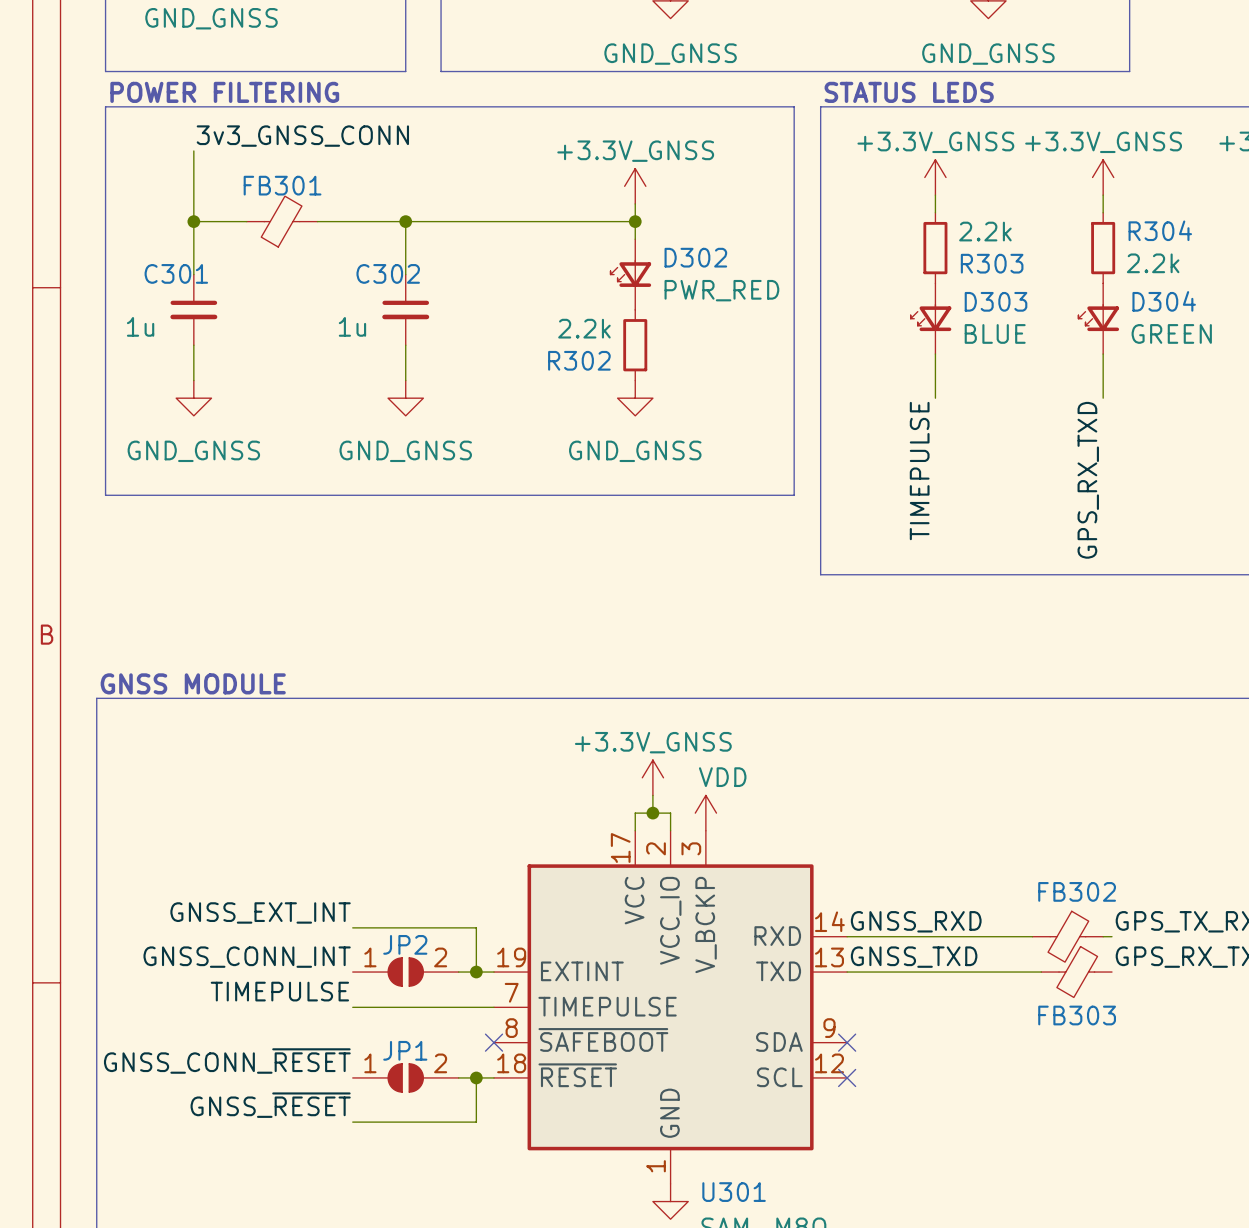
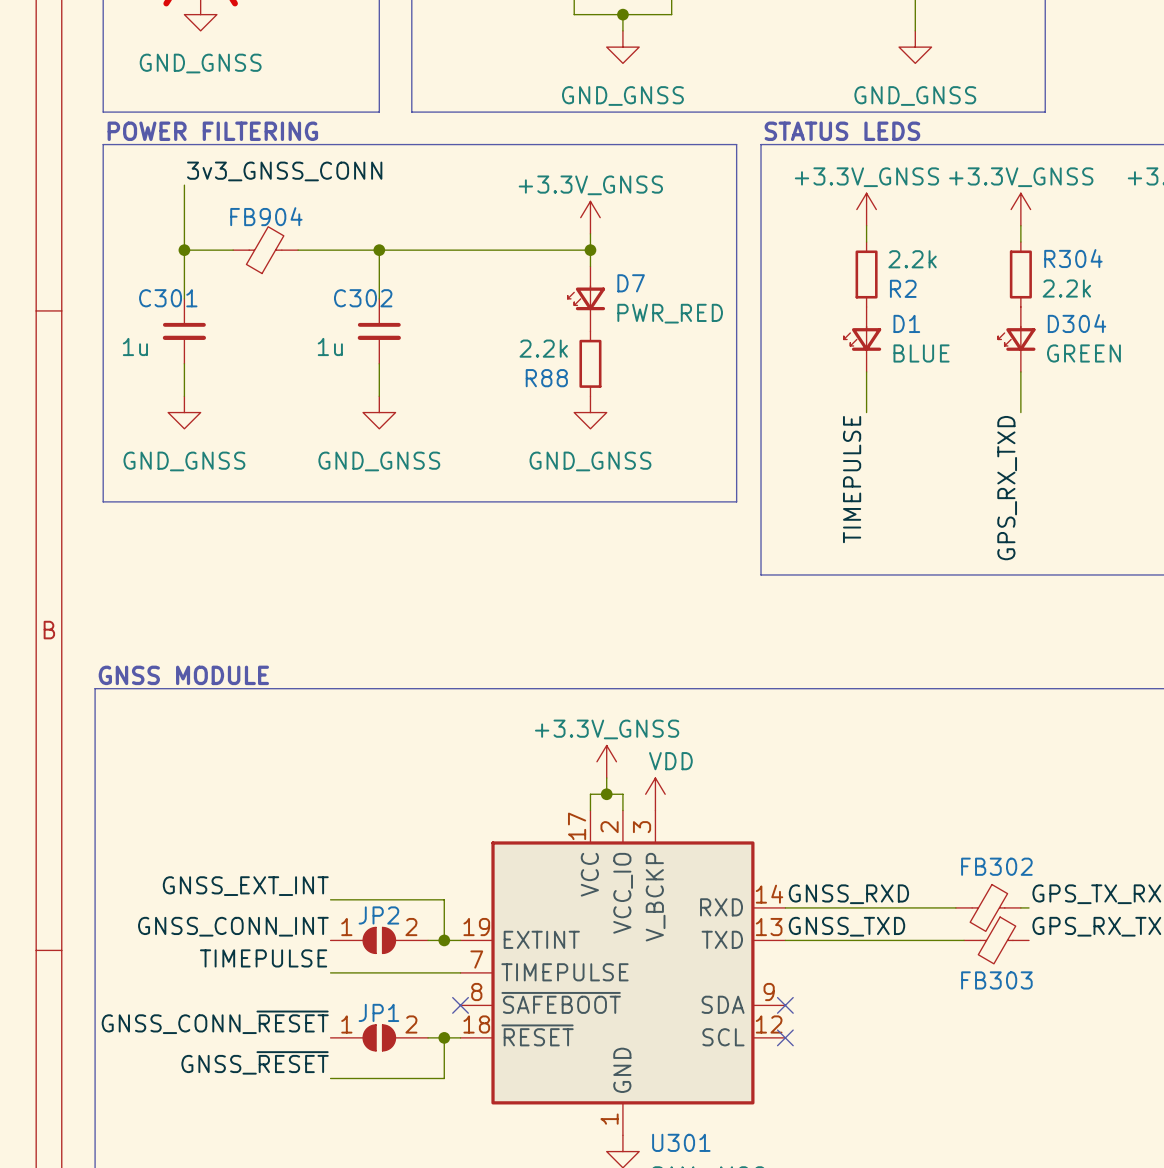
FB301 name: FB301 (282, 185) -> FB904 (266, 216)
D302 name: D302 (695, 257) -> D7 (631, 283)
R303 name: R303 (992, 263) -> R2 (903, 288)
D303 name: D303 (996, 301) -> D1 (906, 323)
R302 name: R302 (579, 360) -> R88 (546, 378)

